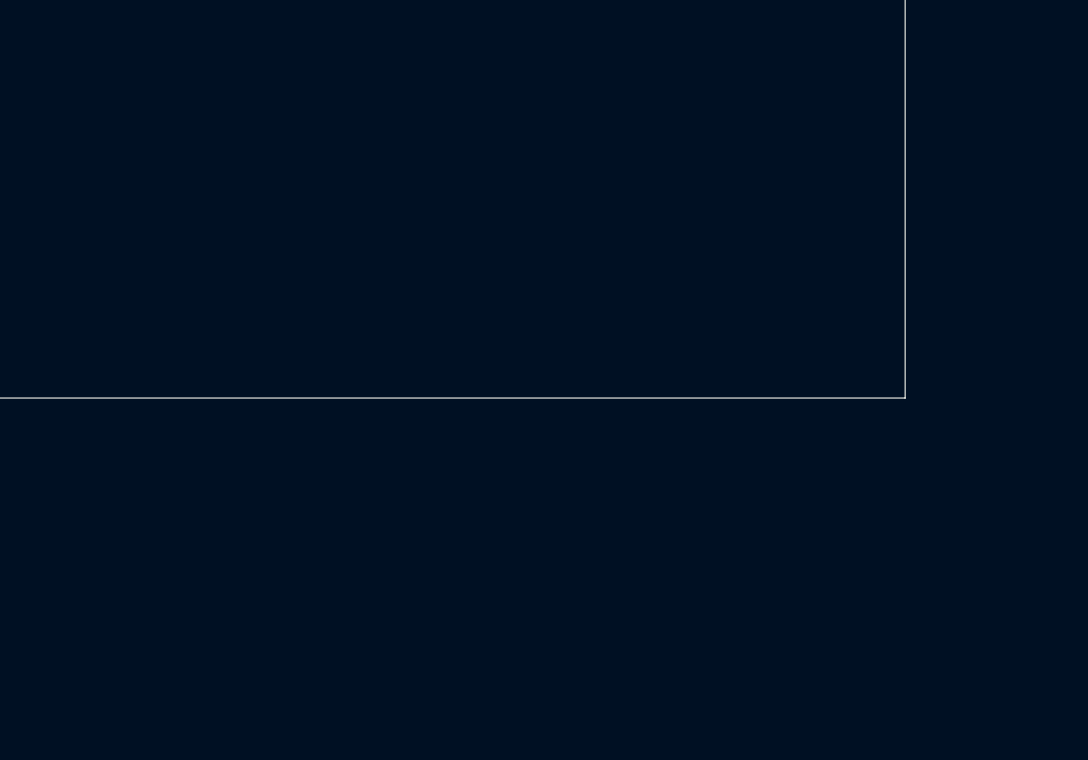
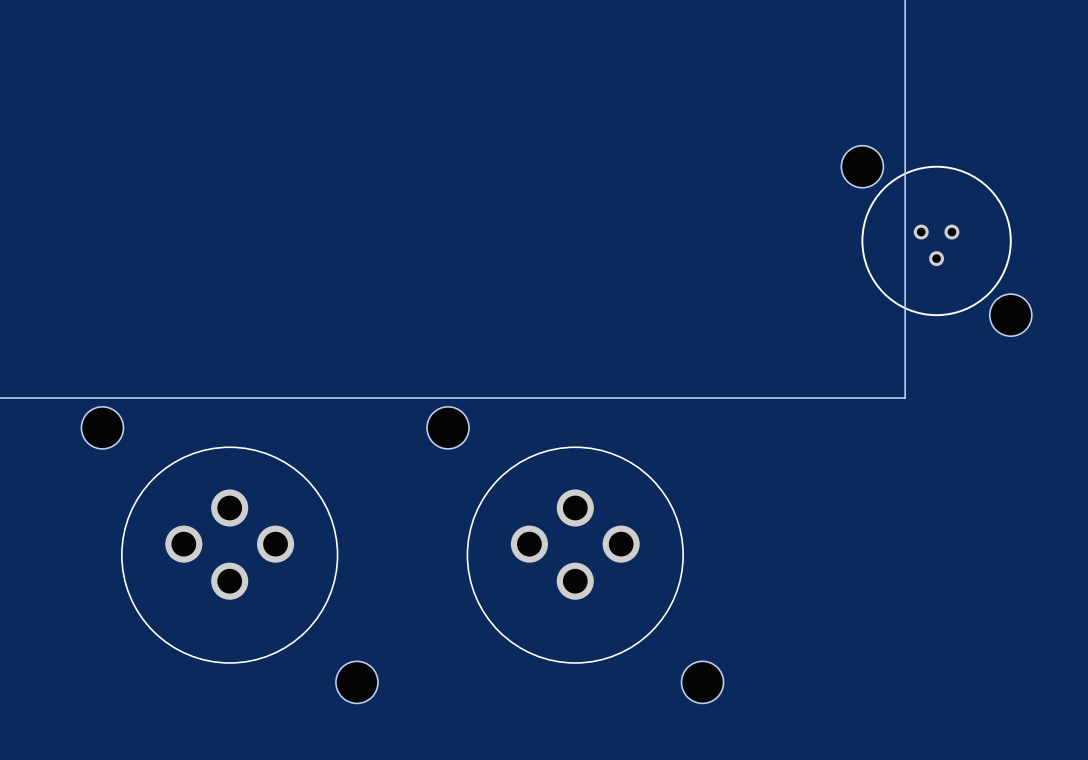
part: none -> (936, 240)
part: none -> (229, 555)
part: none -> (575, 555)

